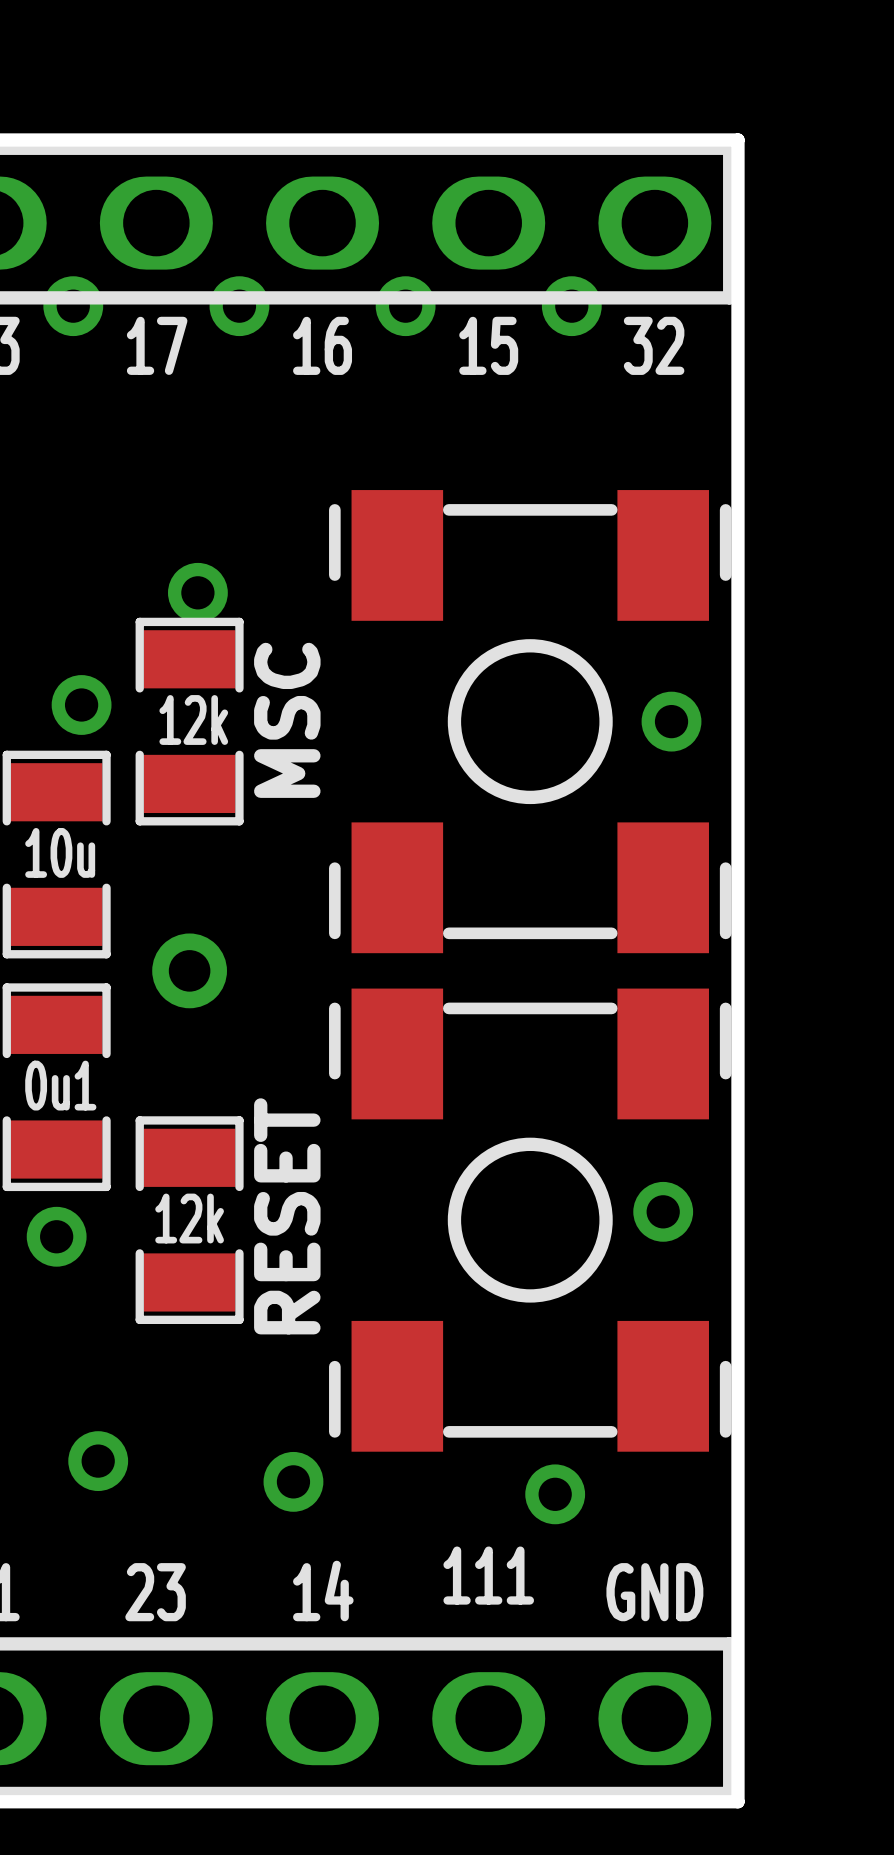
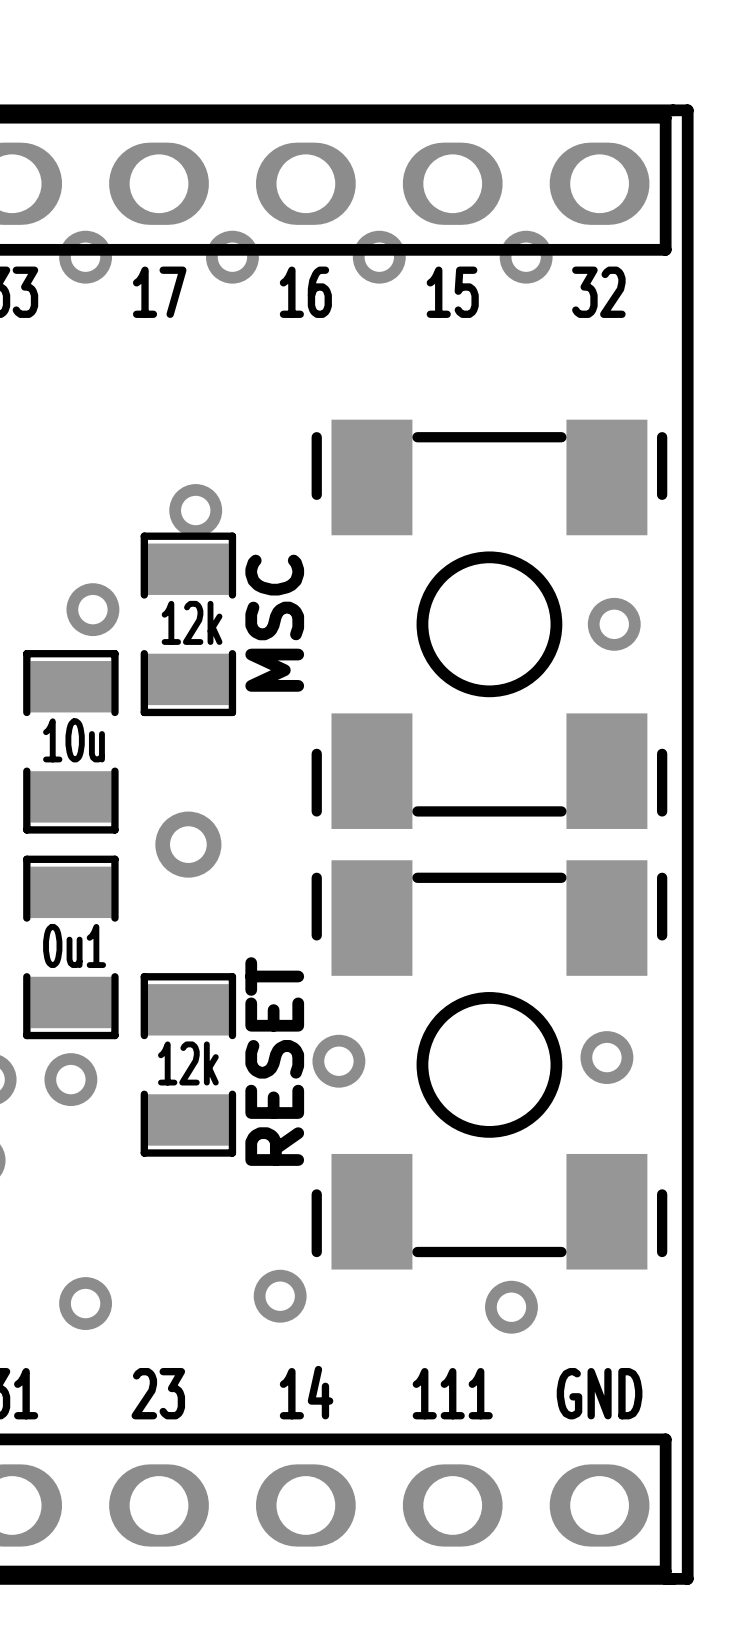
board edge: (737, 139) (737, 1801) -> (673, 110) (687, 110) (687, 1578) (673, 1578)
part: none -> (338, 1061)
part position: (98, 1461) -> (85, 1303)
part text position: 111 (488, 1575) -> 111 (452, 1393)

